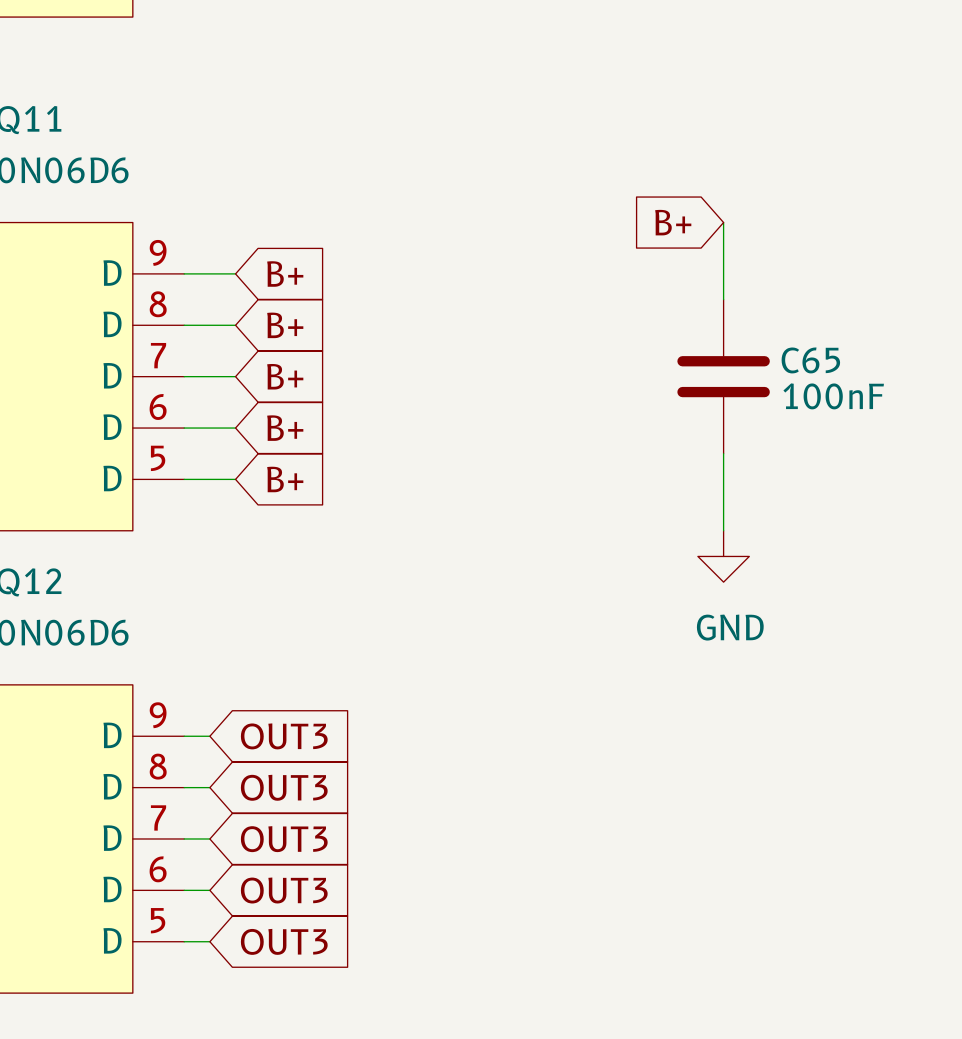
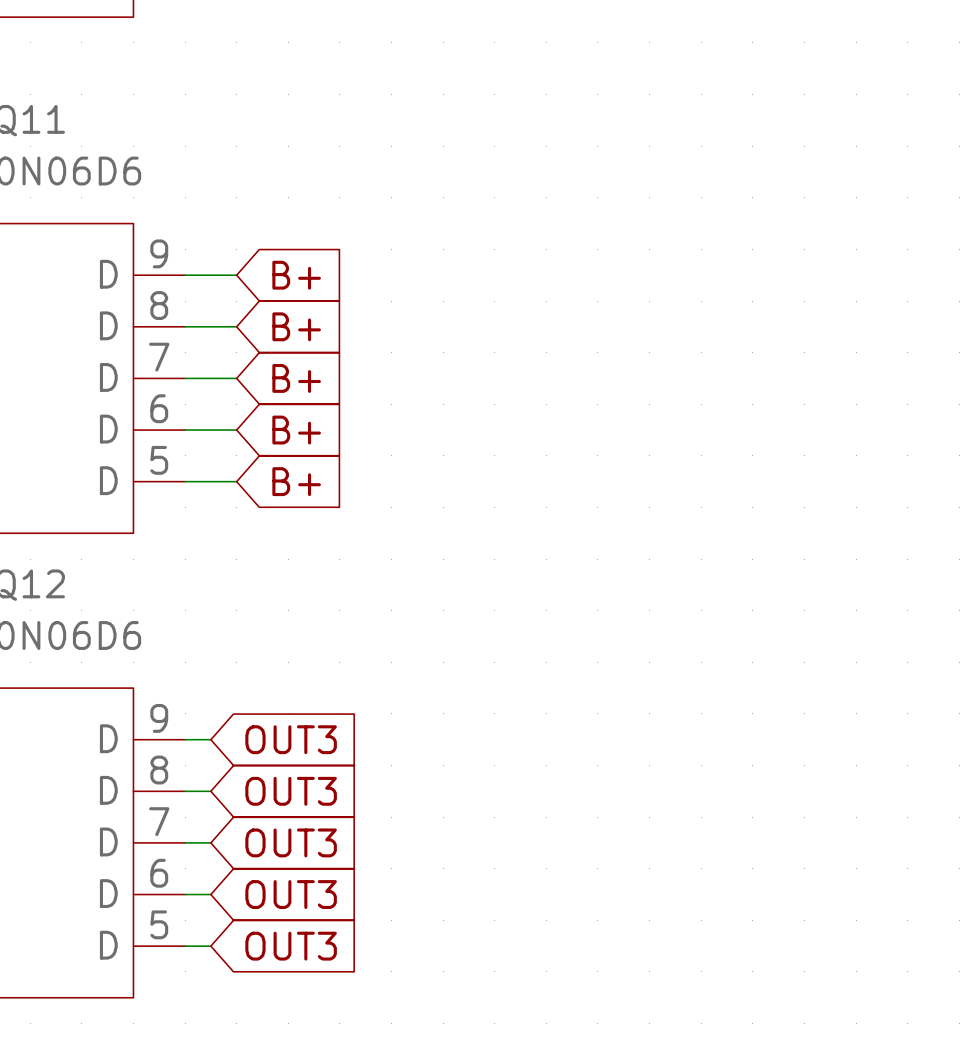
global label: B+ (673, 222) -> none
wire: (723, 222) (723, 299) -> none
C65: 100nF (723, 376) -> none
wire: (723, 453) (723, 530) -> none
power symbol: GND (723, 556) -> none

